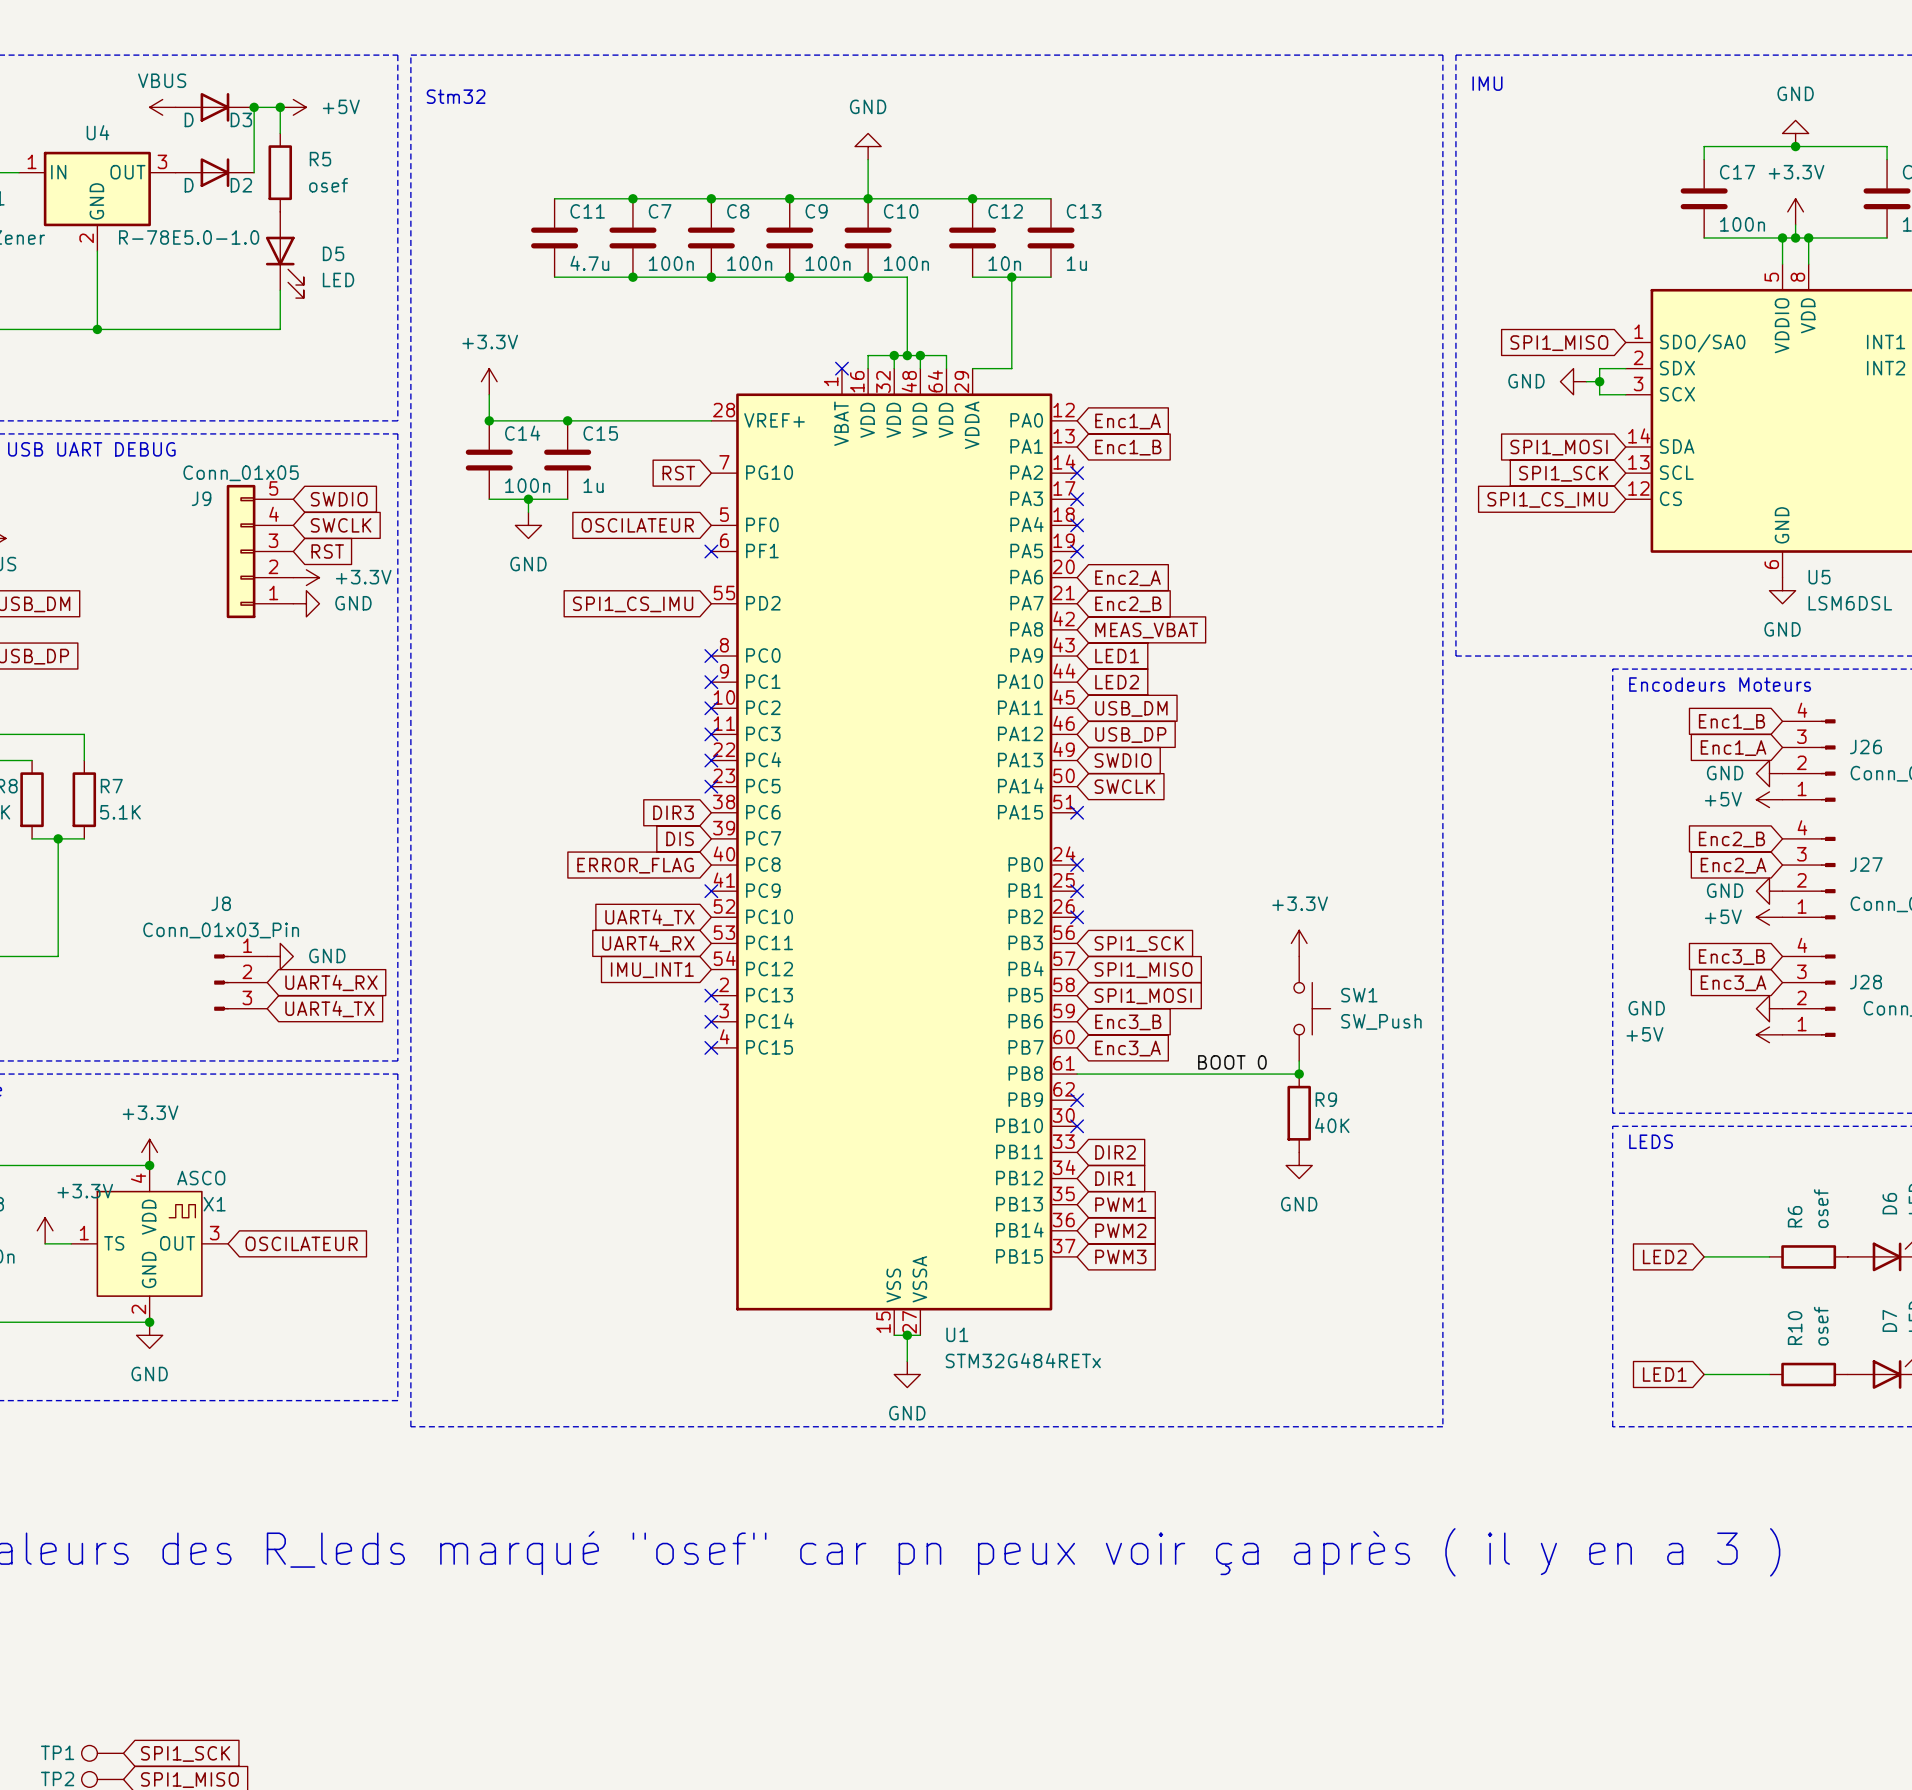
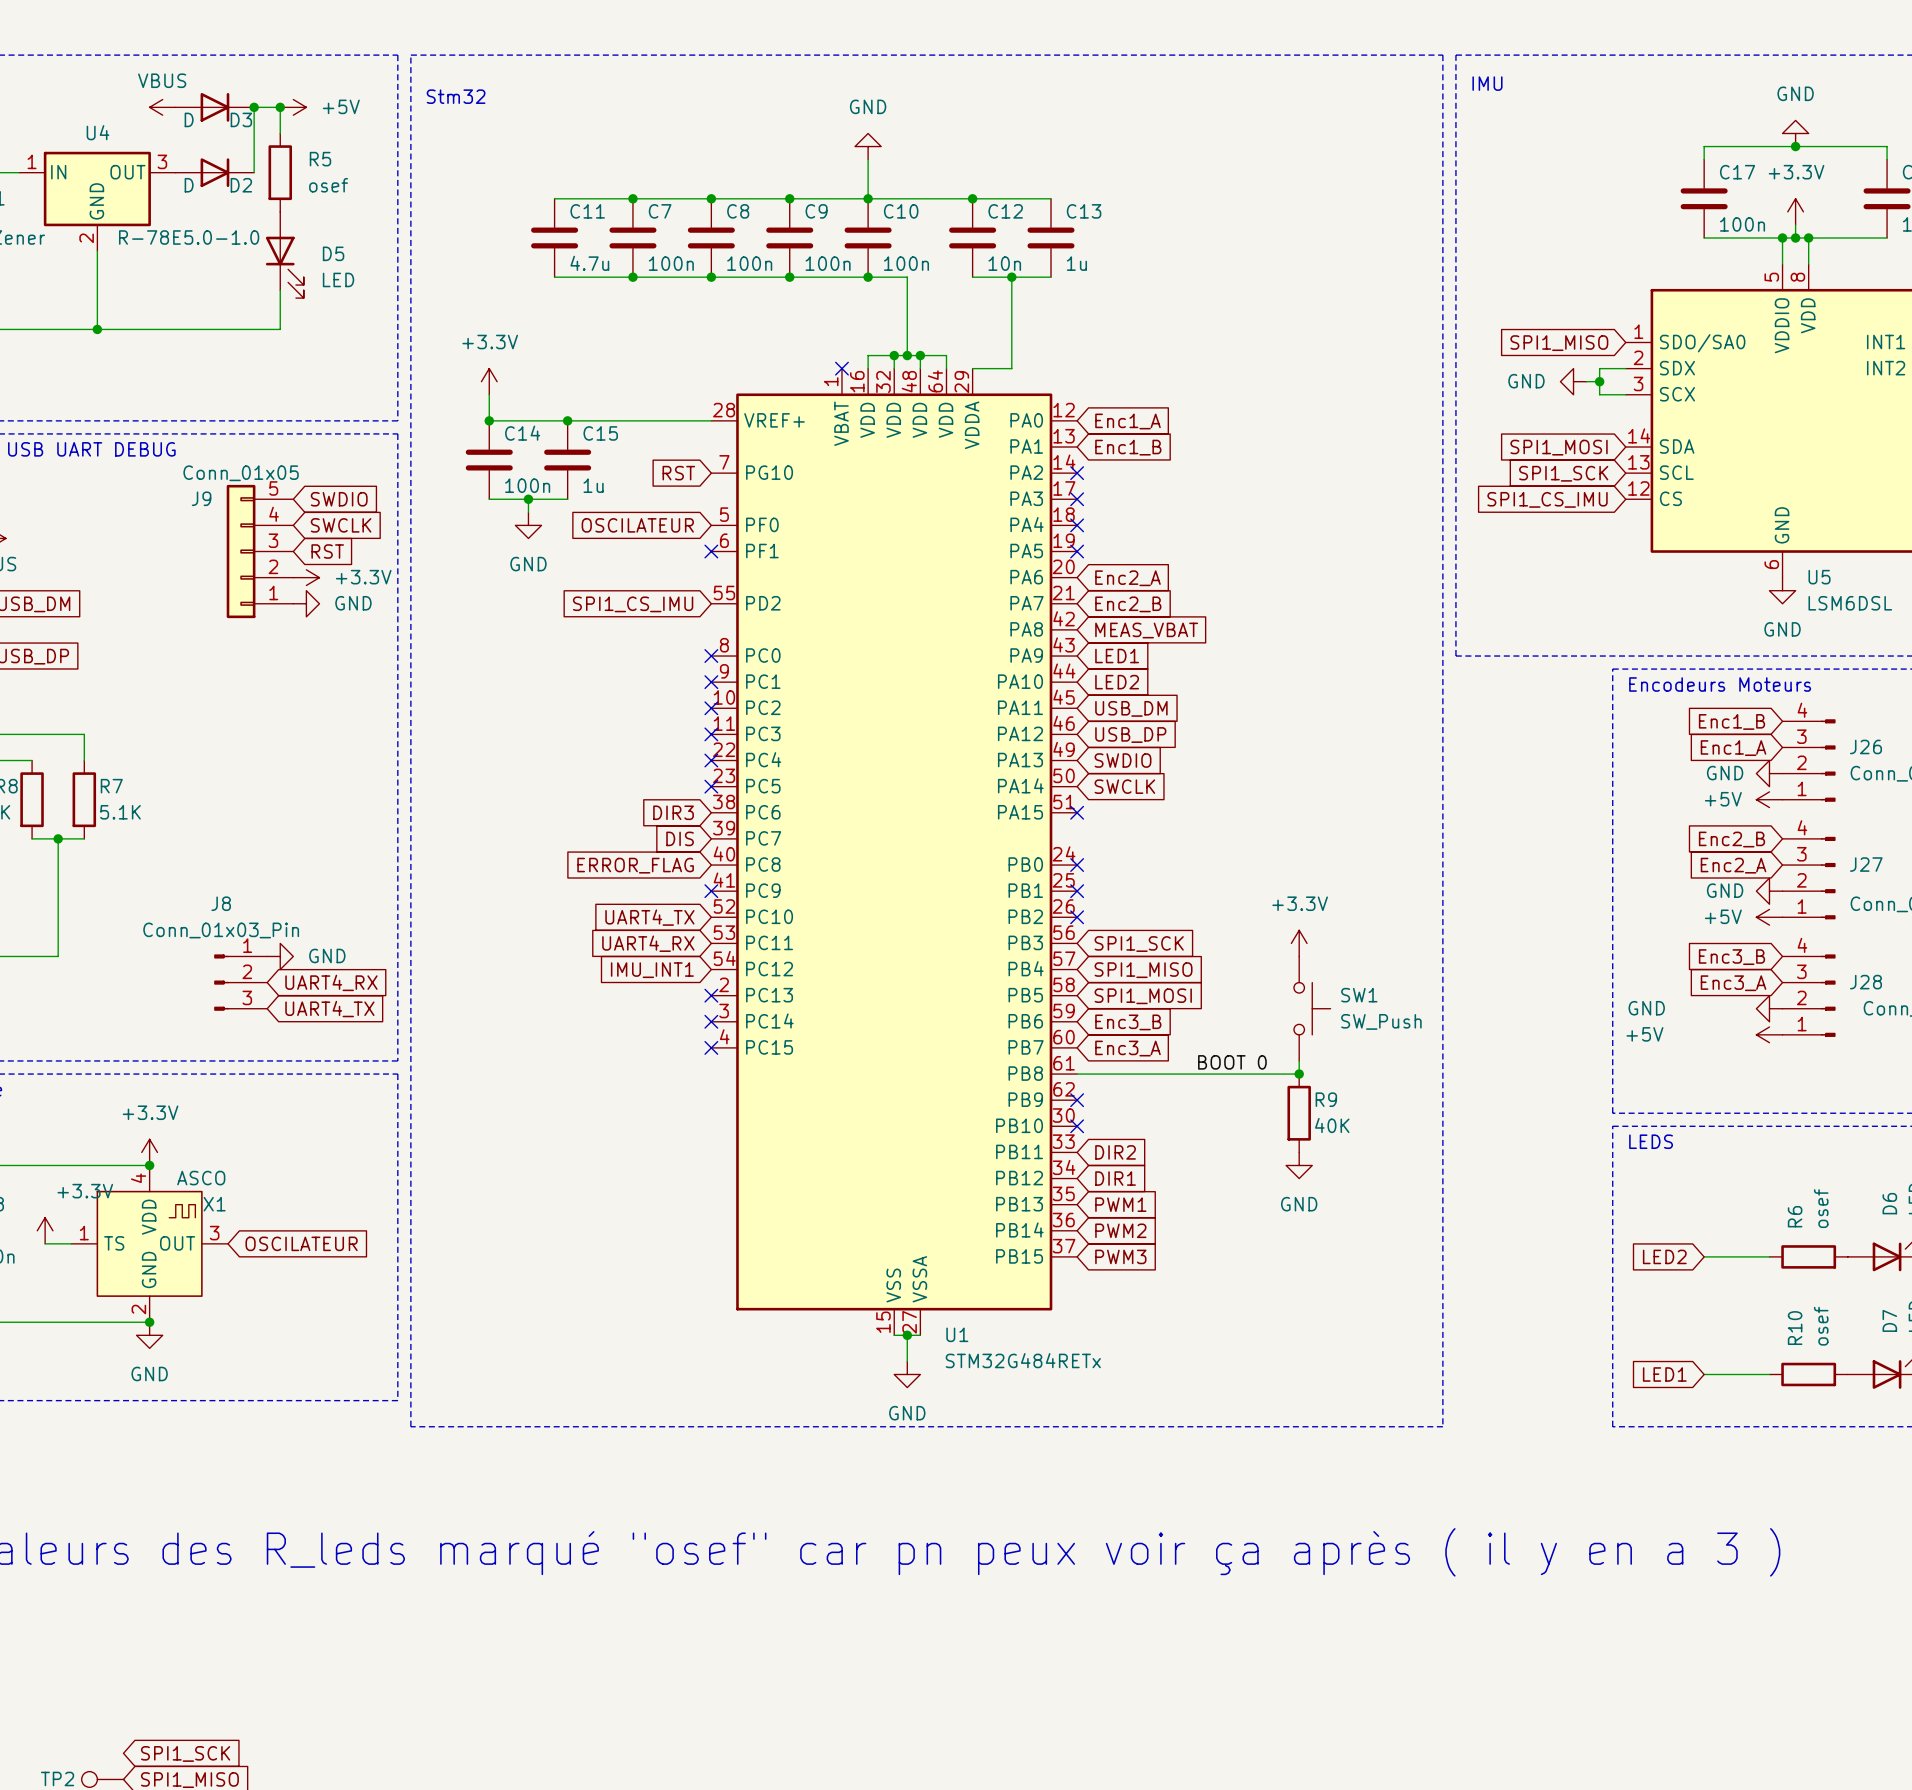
TP1: (102, 1753) -> none

